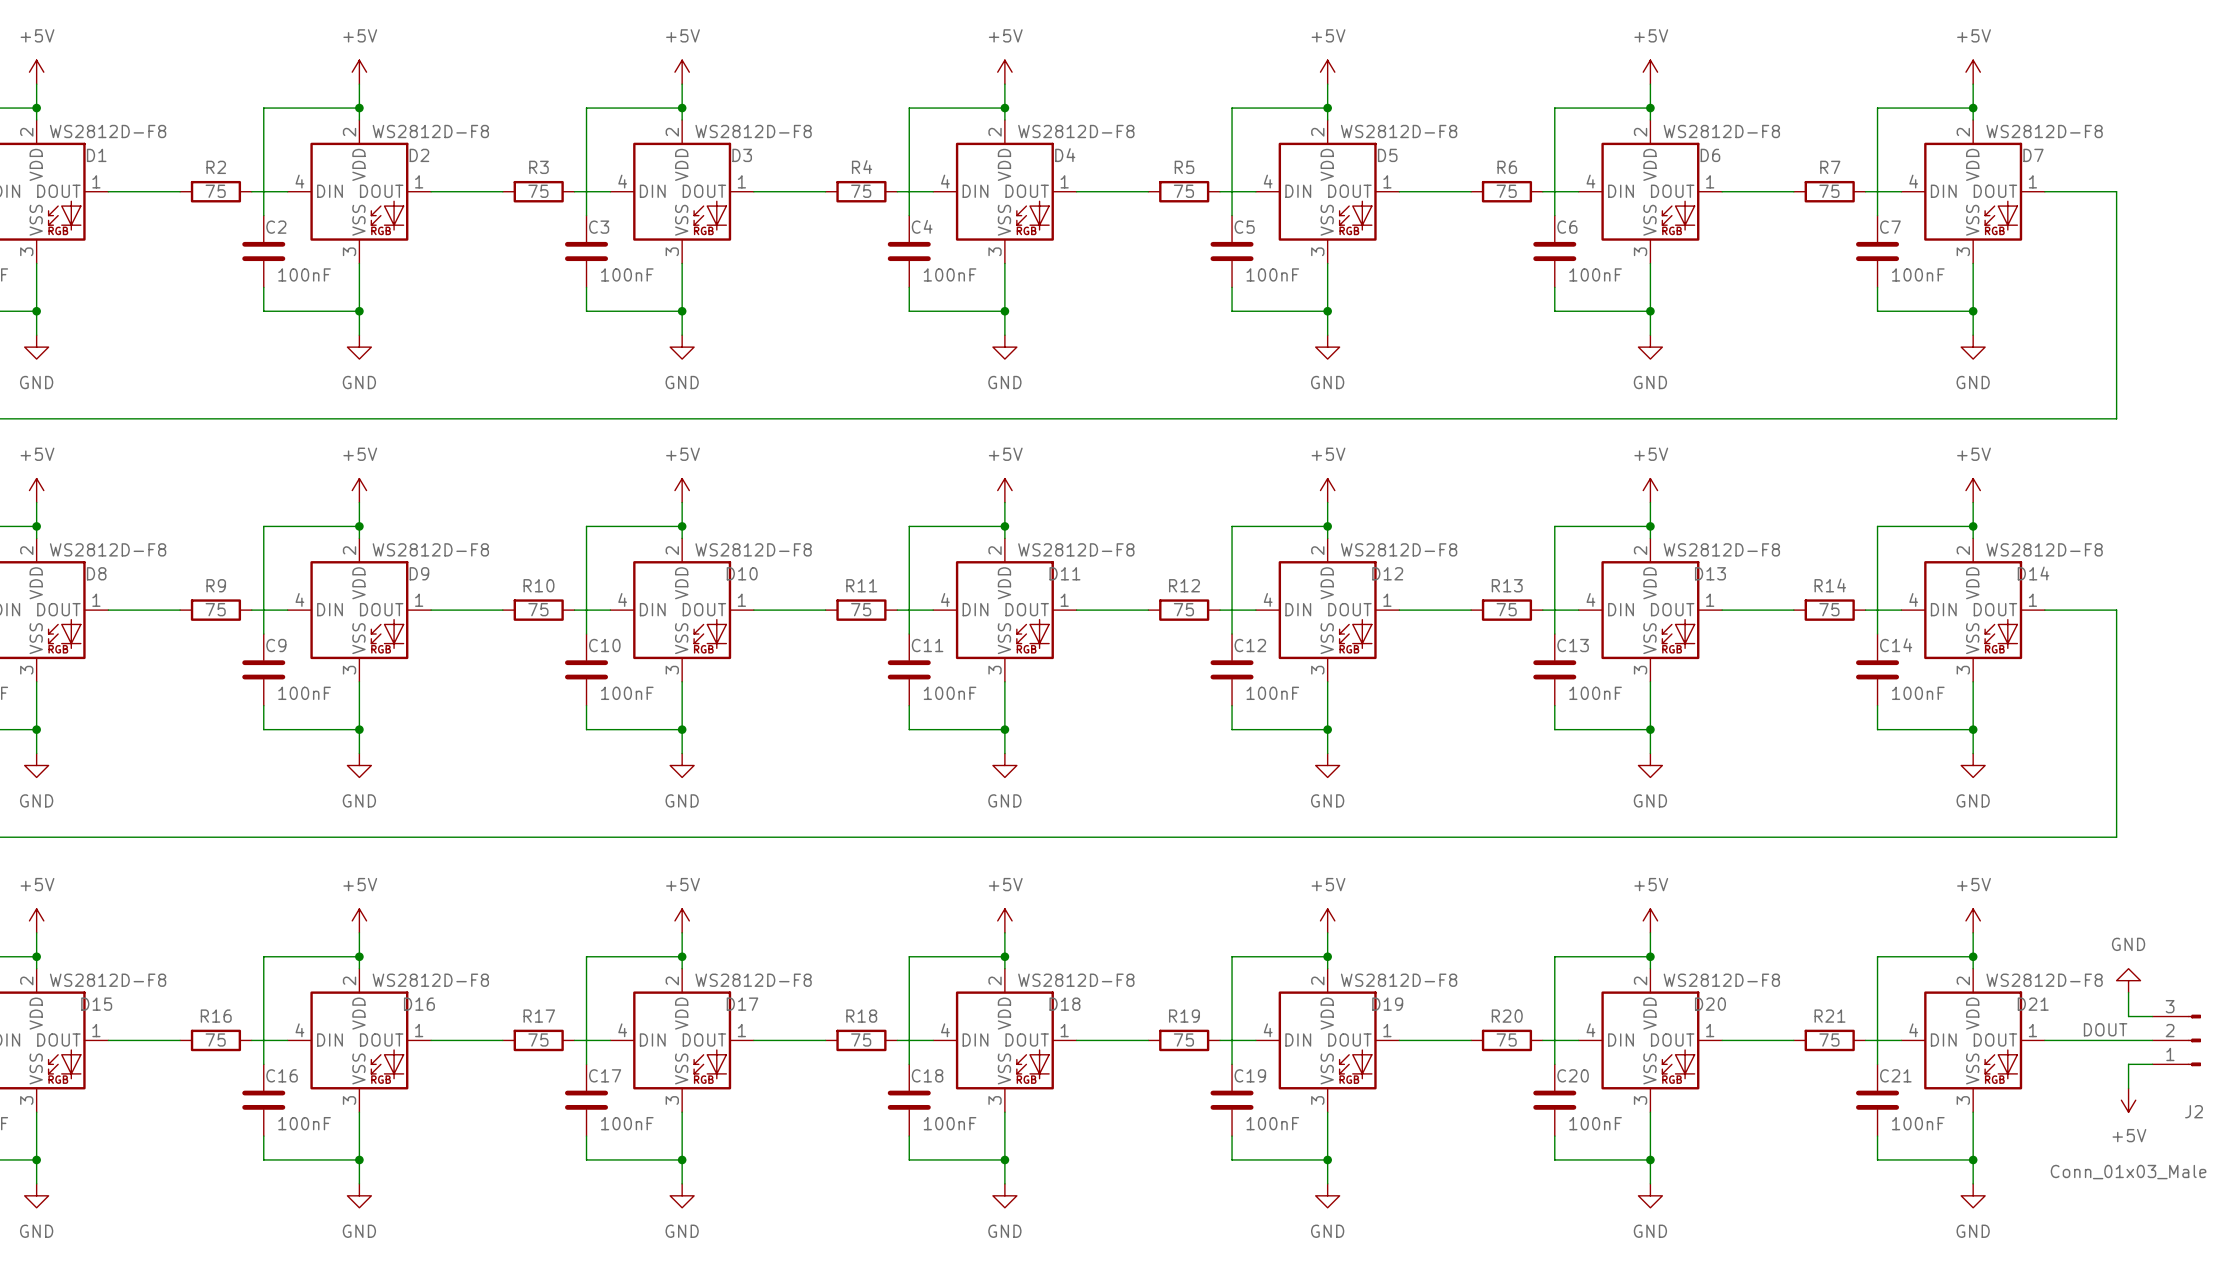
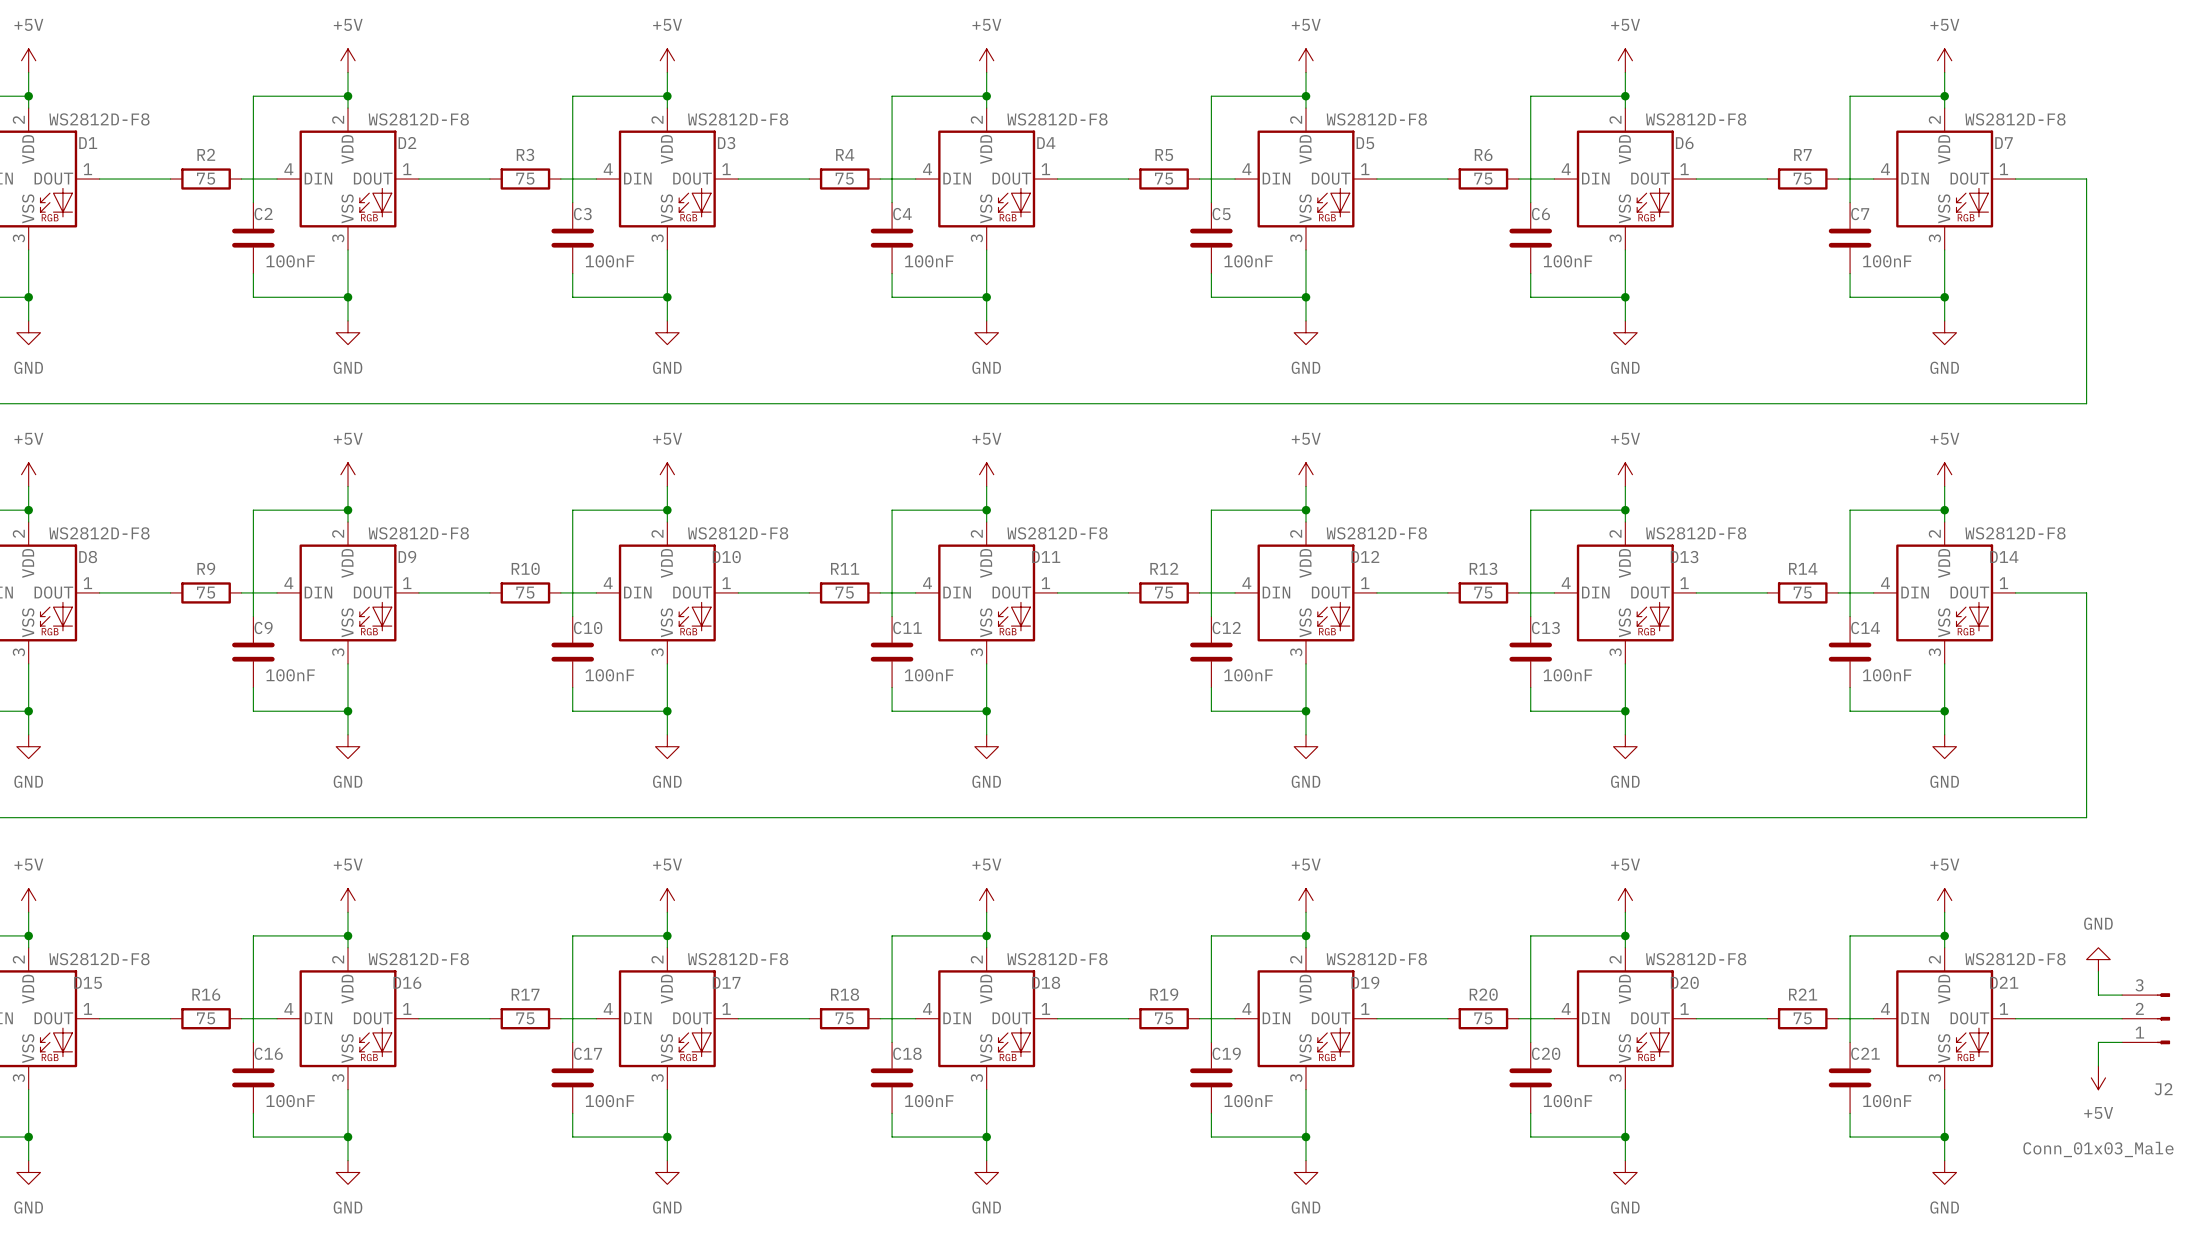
label: DOUT (2105, 1029) -> none

